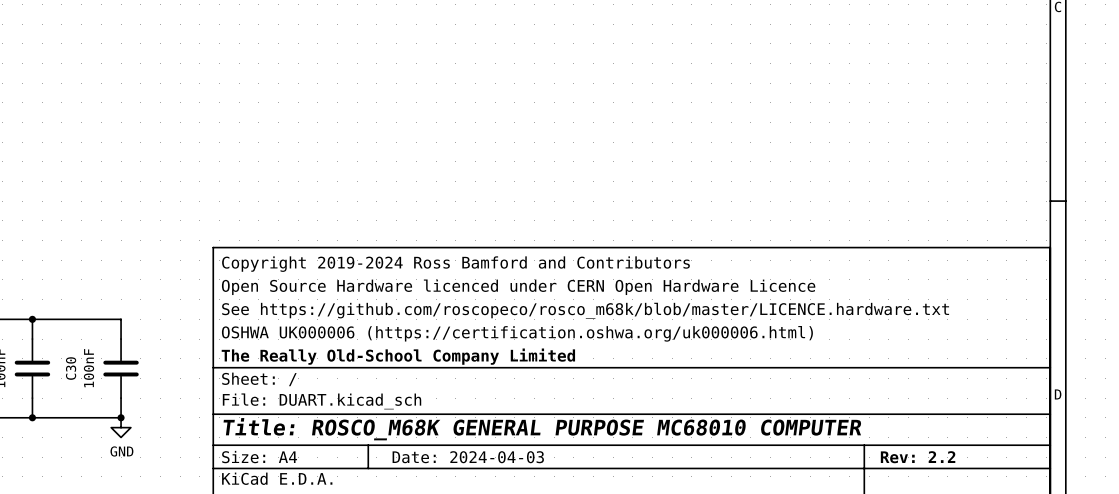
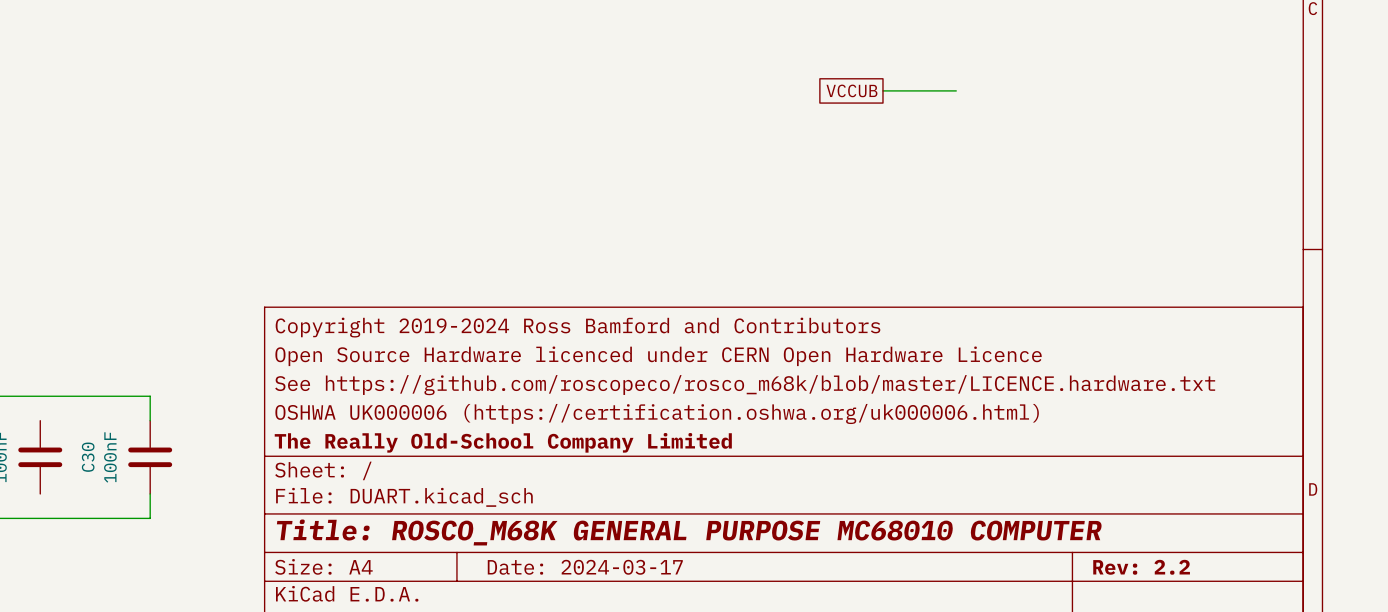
global label: none -> VCCUB (851, 90)
wire: none -> (882, 90) (956, 90)
wire: (32, 319) (32, 339) -> none
junction: (32, 319) -> none
wire: (32, 398) (32, 417) -> none
junction: (32, 417) -> none
junction: (121, 417) -> none
power symbol: GND (121, 427) -> none
title block: Date: 2024-04-03 (468, 457) -> Date: 2024-03-17 (585, 567)

